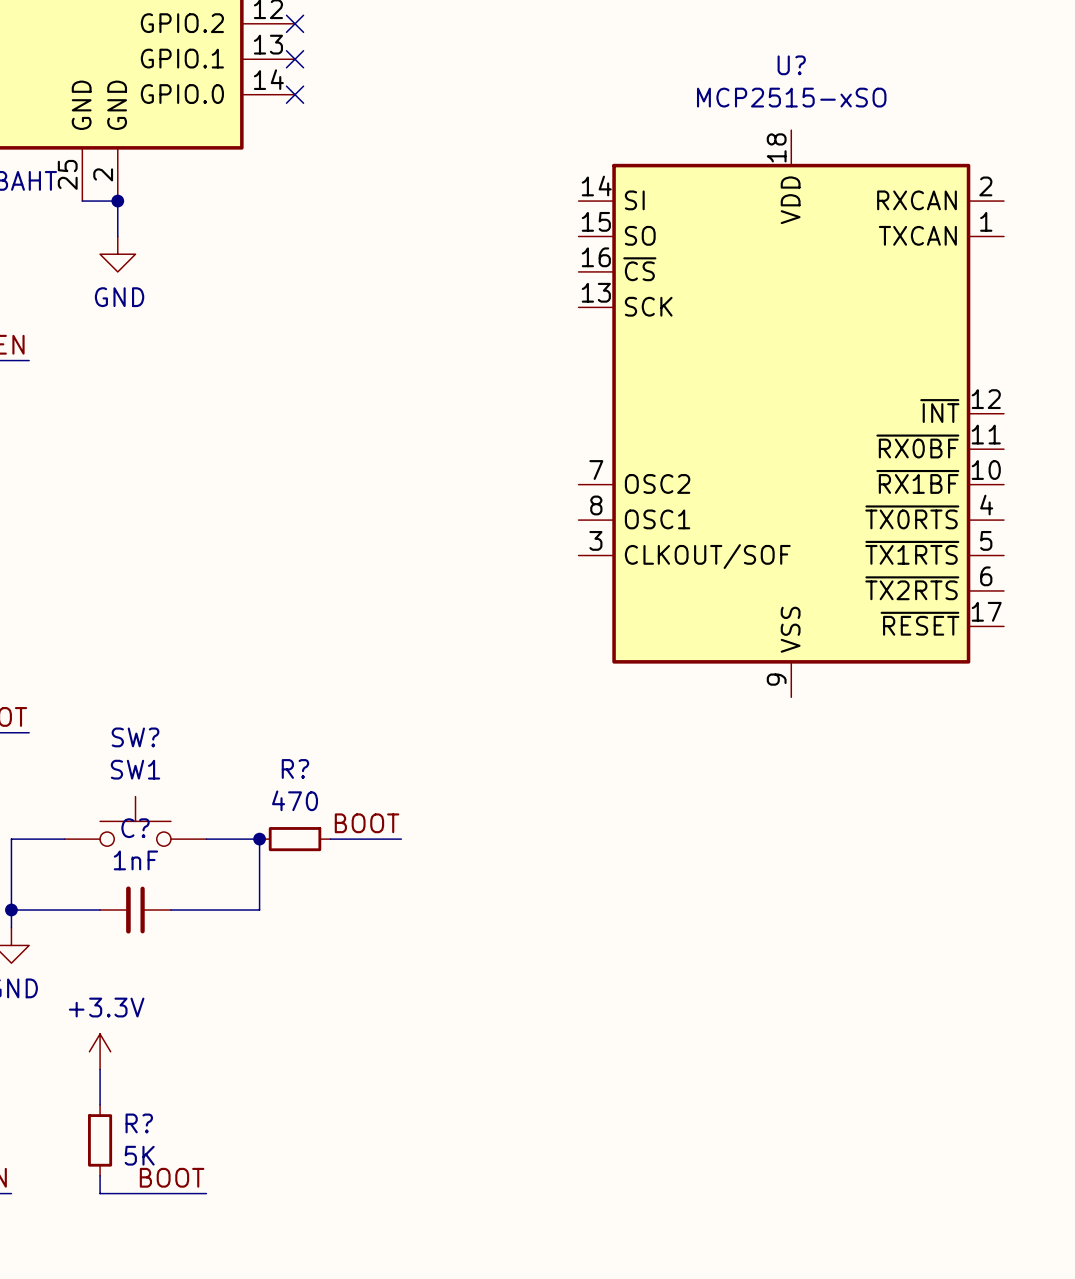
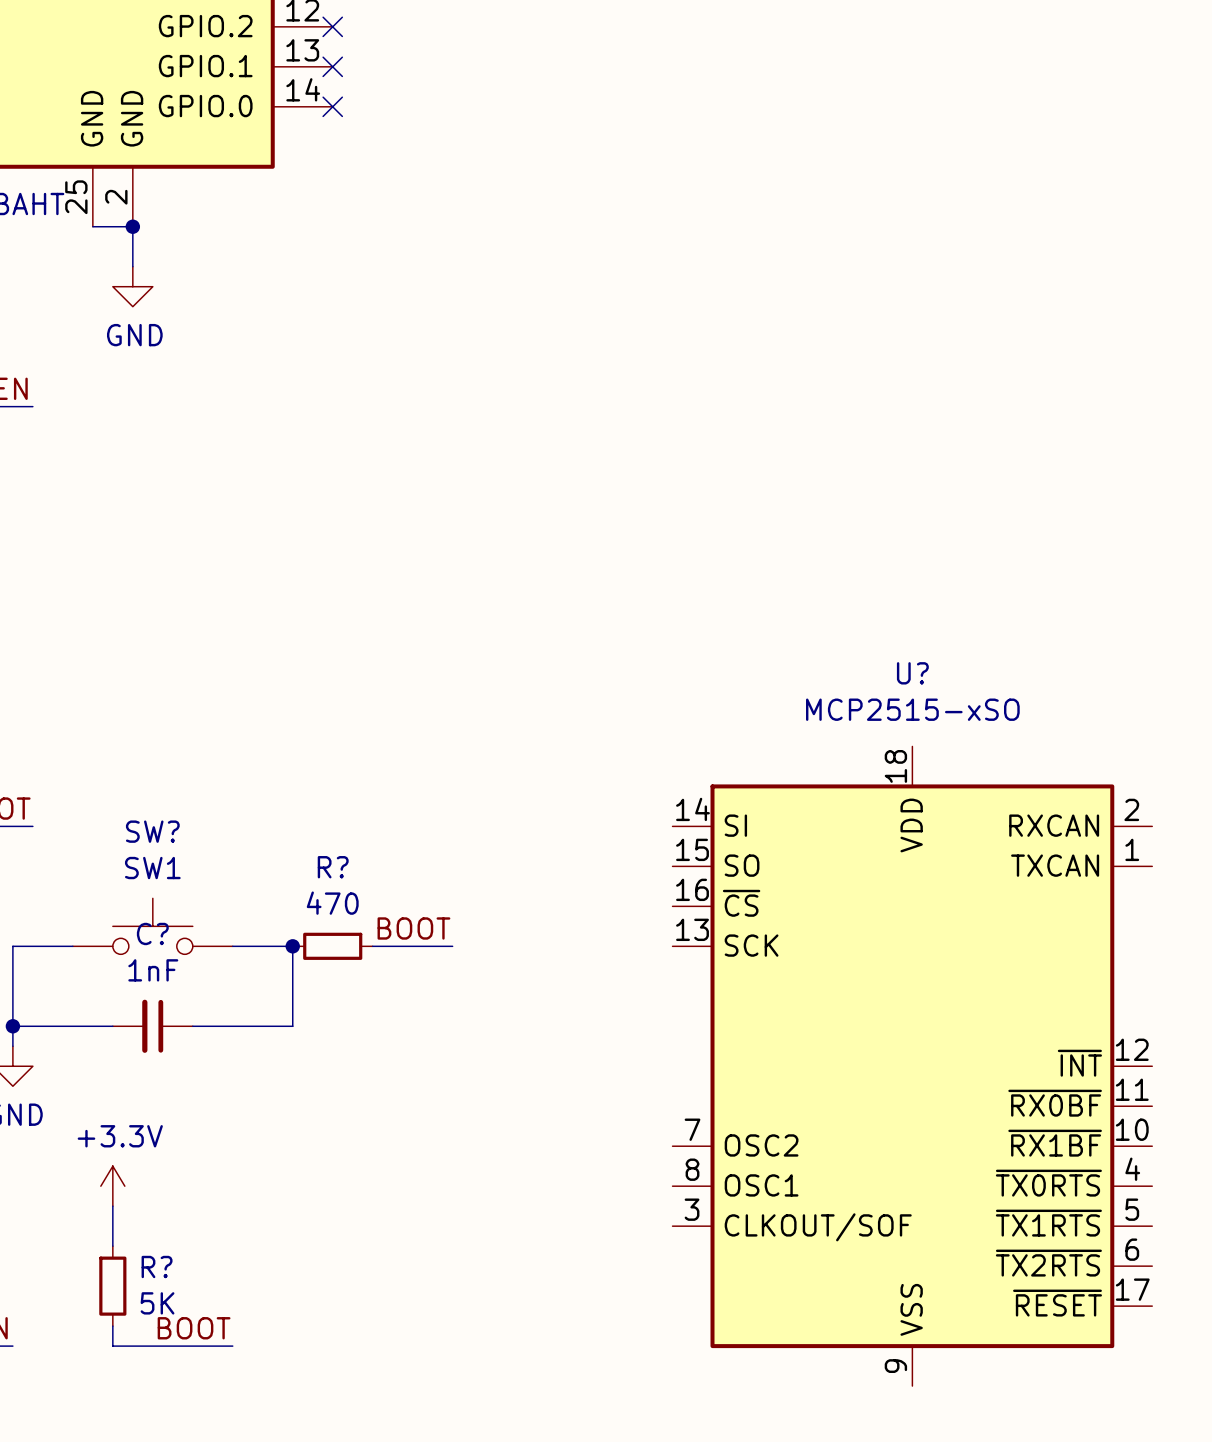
U?: MCP2515-xSO (791, 413) -> none
U?: none -> MCP2515-xSO (912, 1066)

